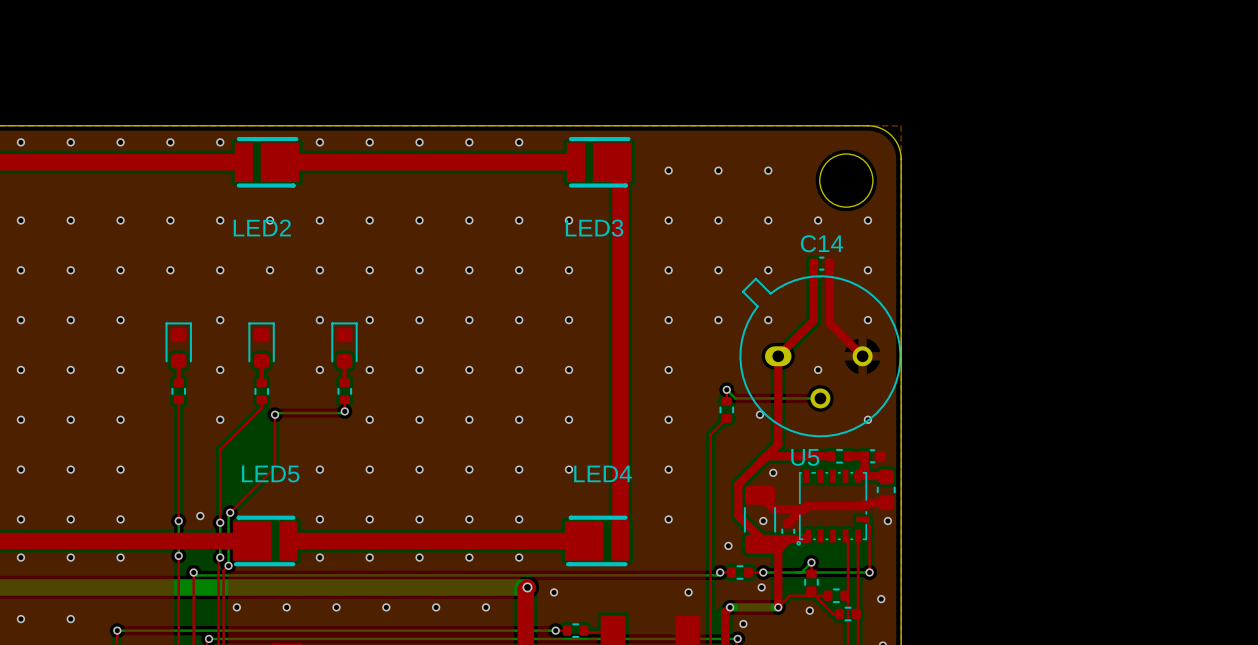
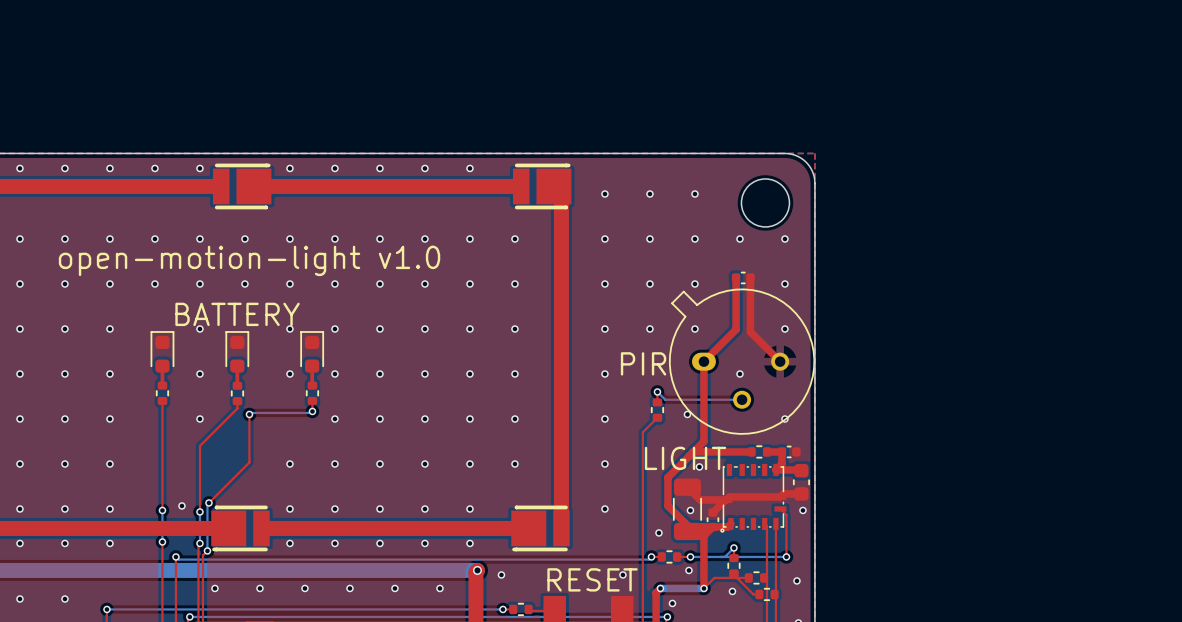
LED2 name: LED2 (262, 227) -> none
LED3 name: LED3 (594, 228) -> none
text: none -> open-motion-light v1.0 (249, 260)
C14 name: C14 (822, 243) -> none
text: none -> BATTERY (237, 314)
text: none -> PIR (643, 363)
U5 name: U5 (805, 457) -> none
text: none -> LIGHT (685, 458)
LED4 name: LED4 (603, 473) -> none
LED5 name: LED5 (270, 474) -> none
text: none -> RESET (592, 579)

